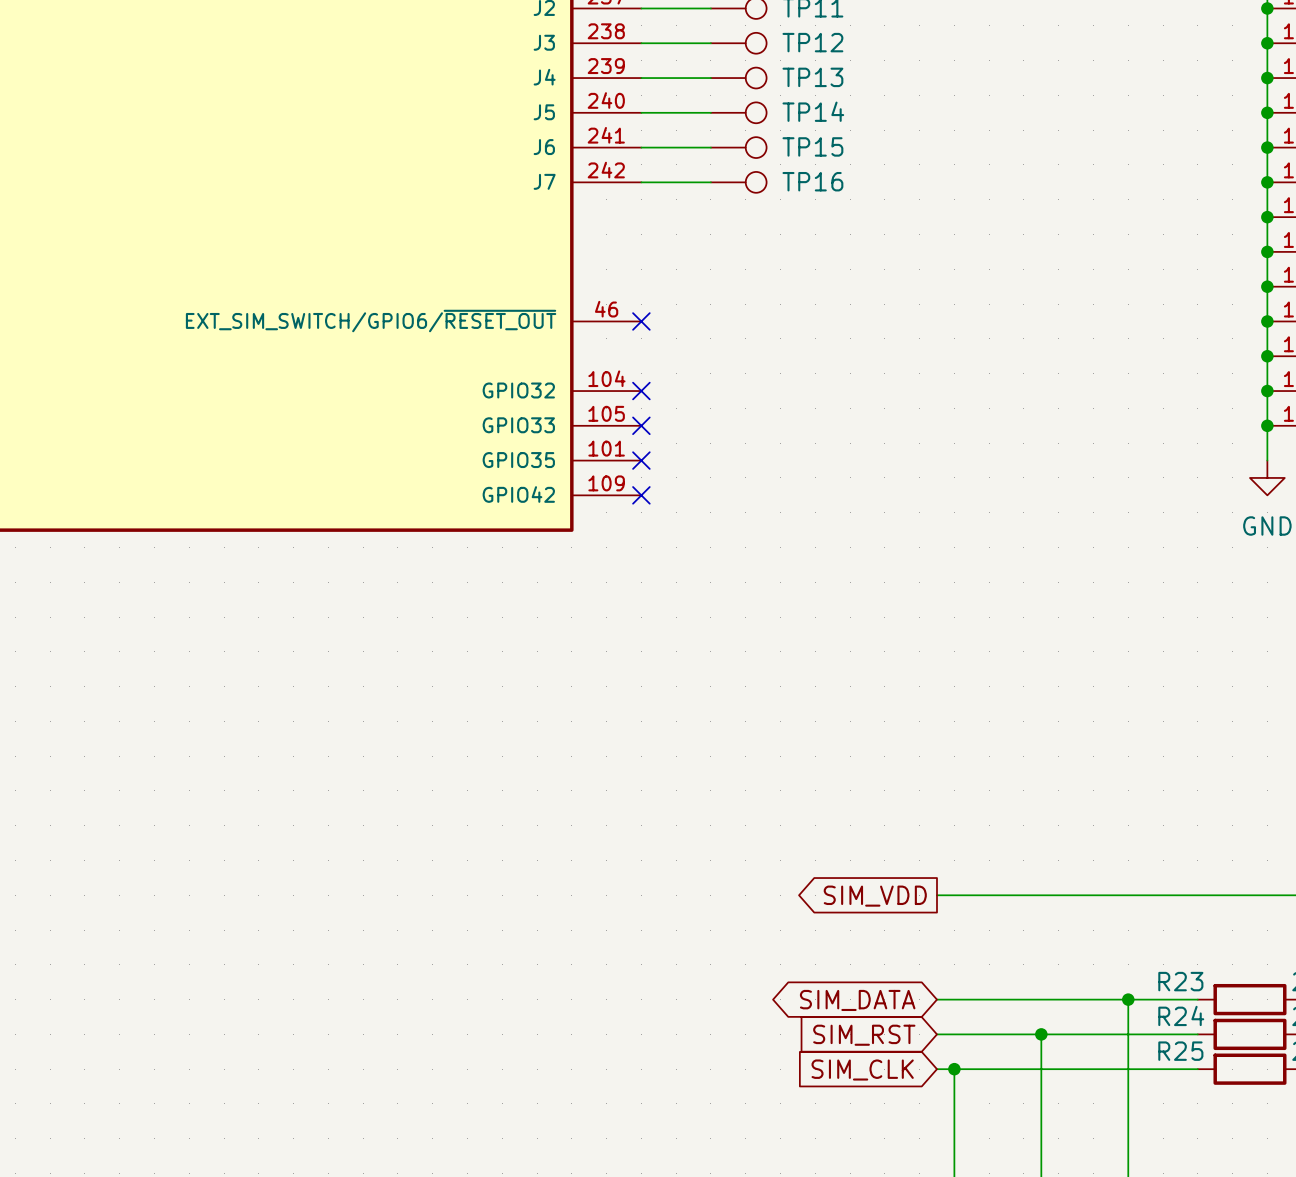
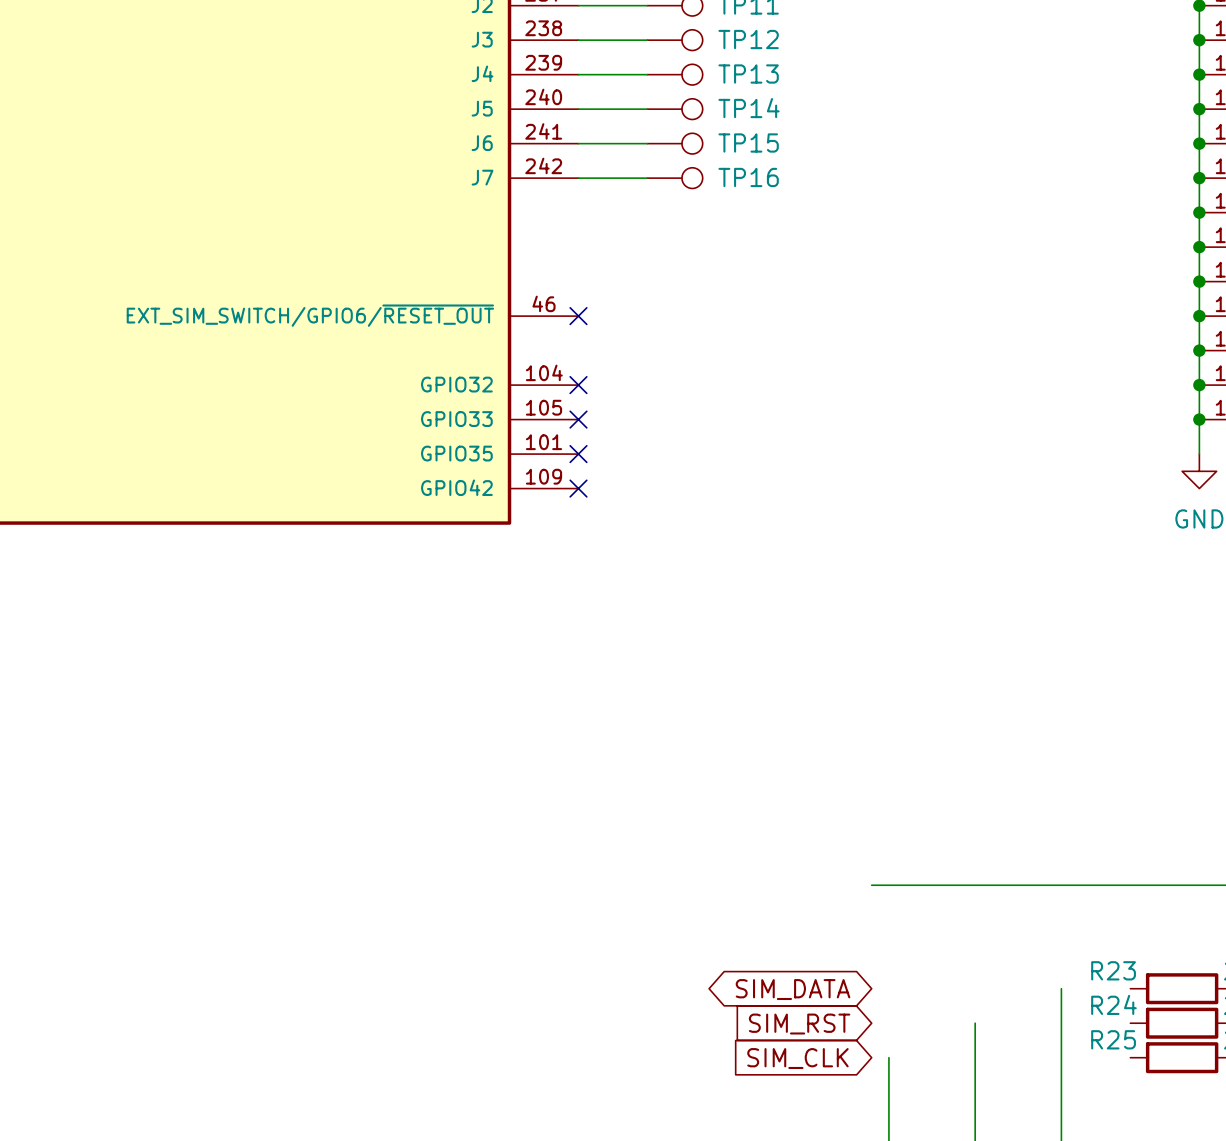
global label: SIM_VDD (875, 896) -> none
wire: (936, 999) (1197, 999) -> none
junction: (1128, 999) -> none
wire: (936, 1034) (1197, 1034) -> none
junction: (1041, 1034) -> none
wire: (936, 1069) (1197, 1069) -> none
junction: (954, 1069) -> none

